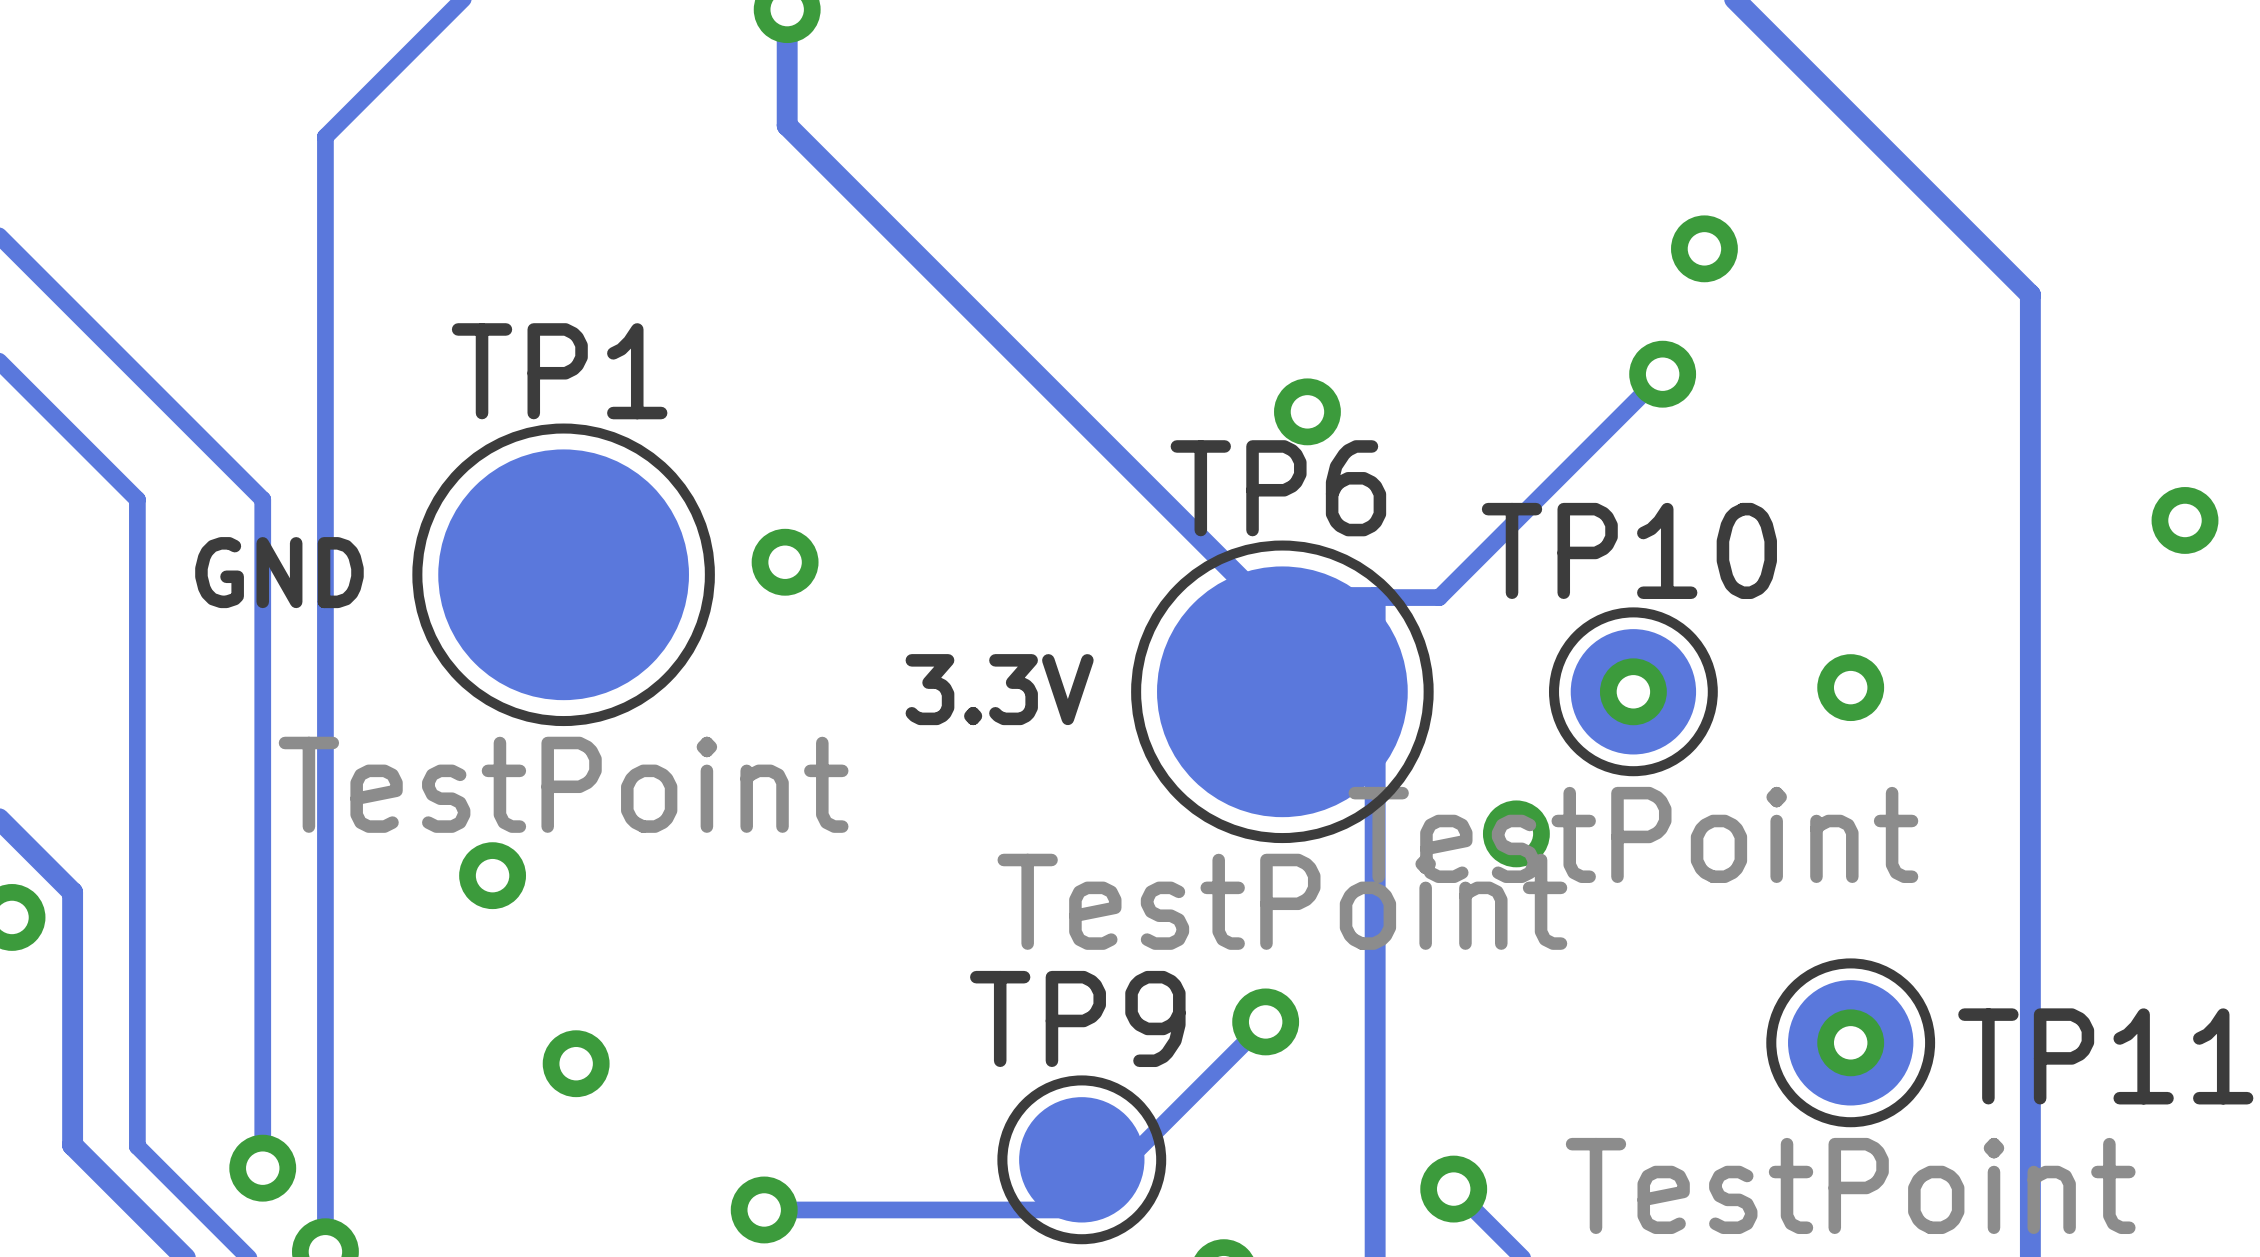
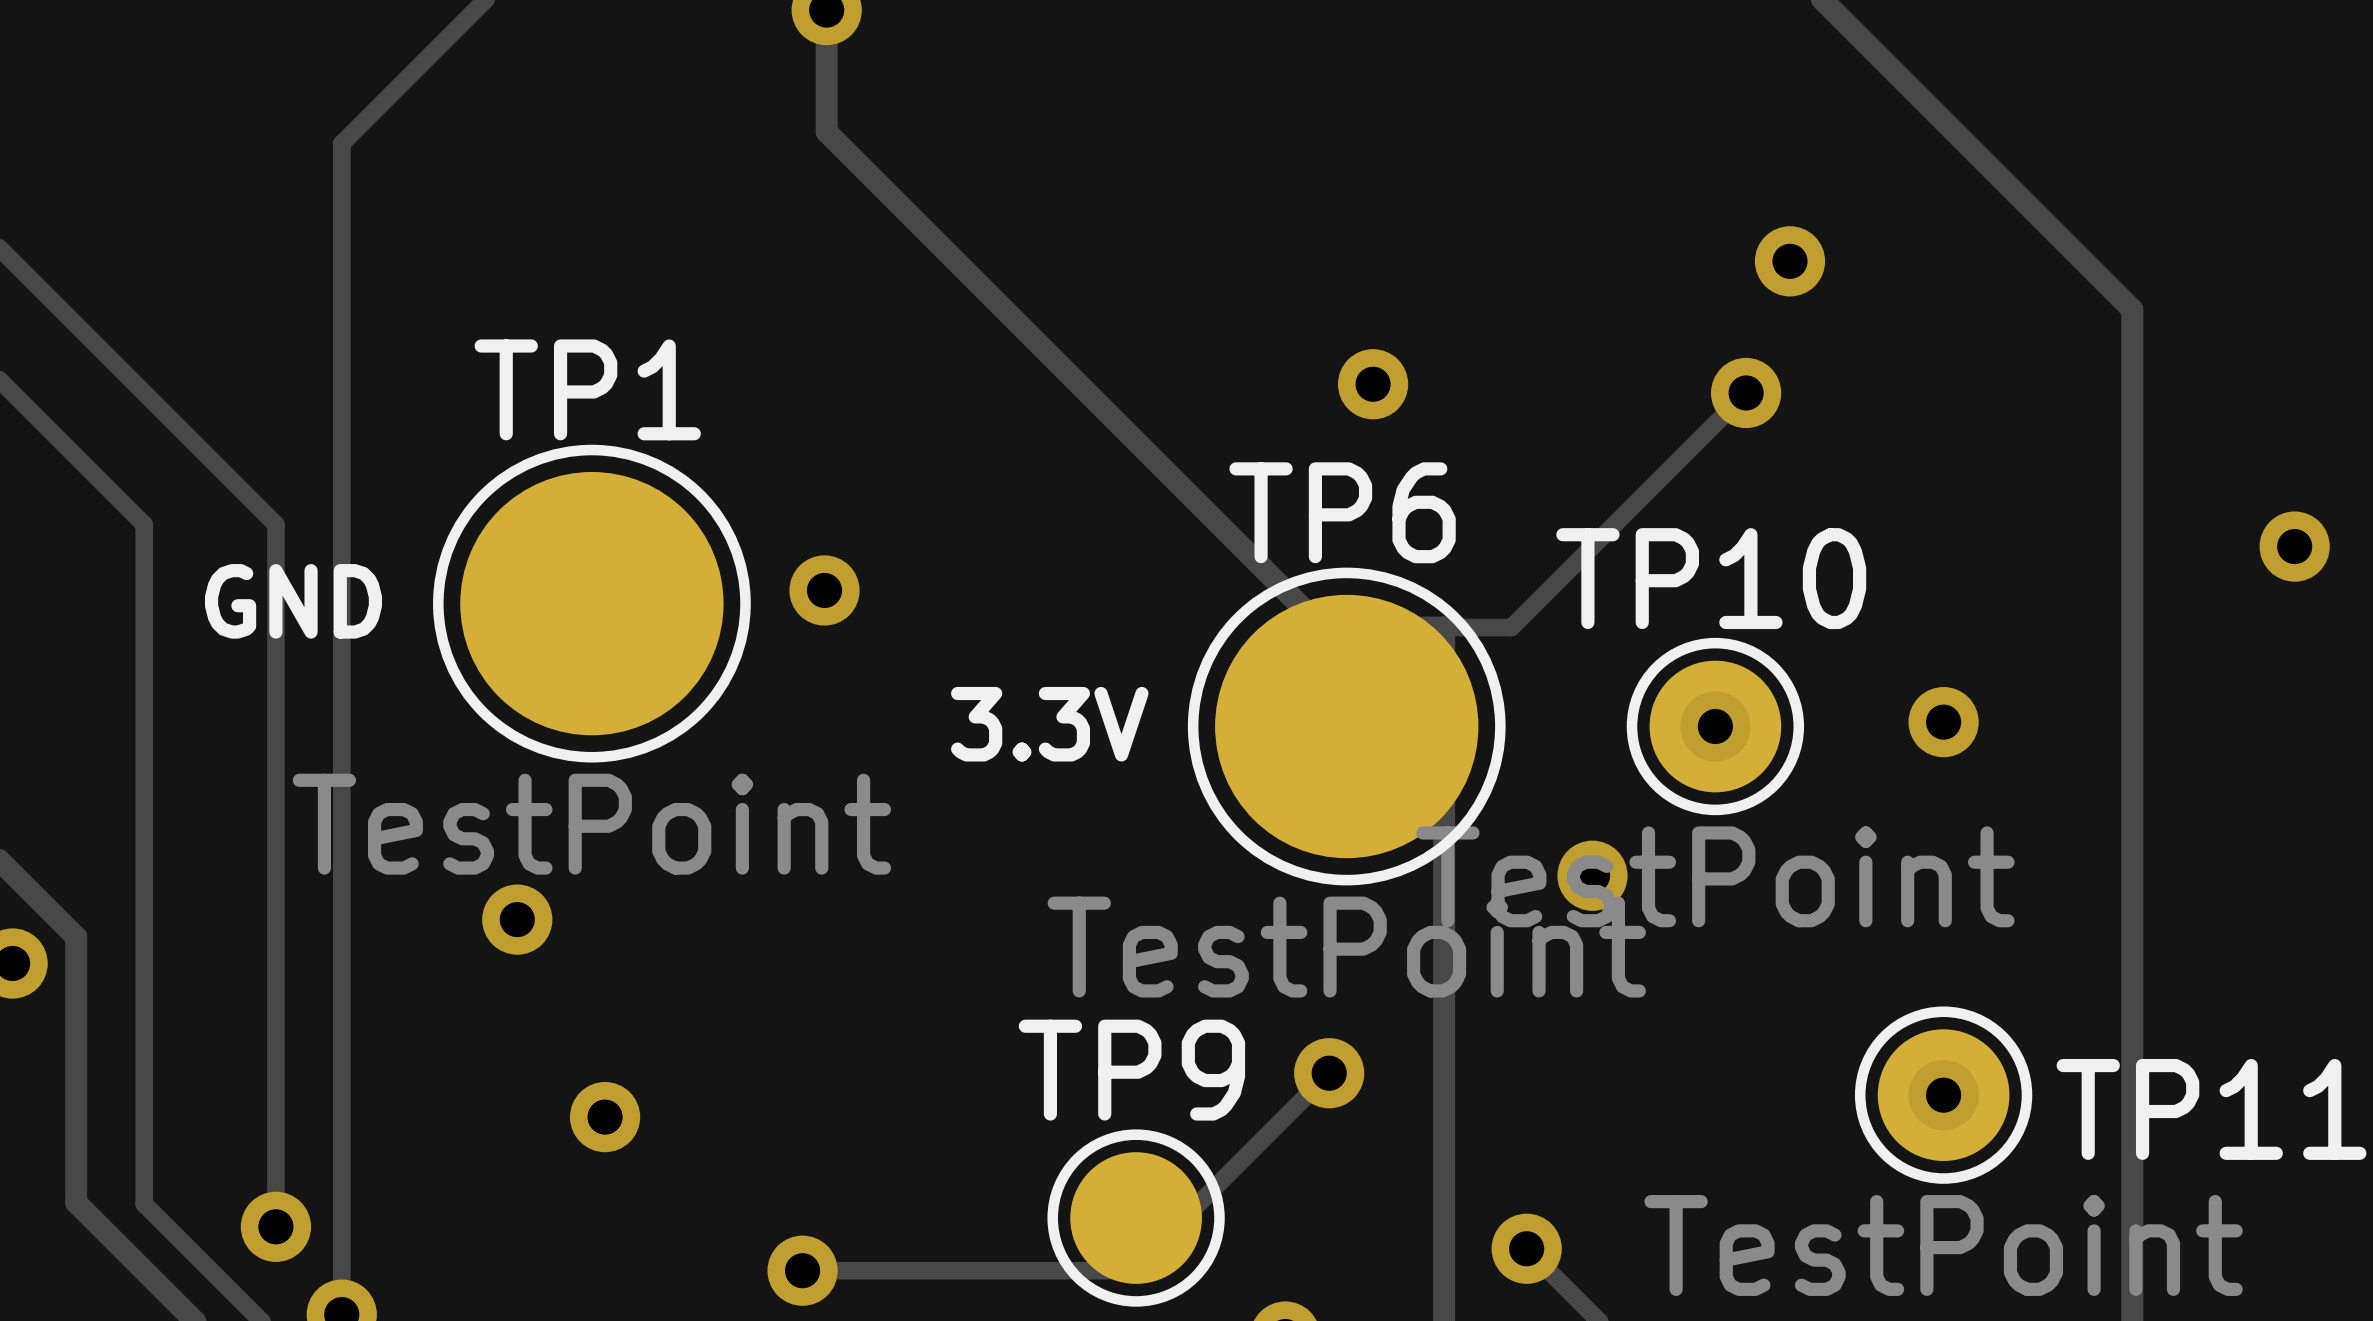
via position: (1307, 411) -> (1373, 384)

